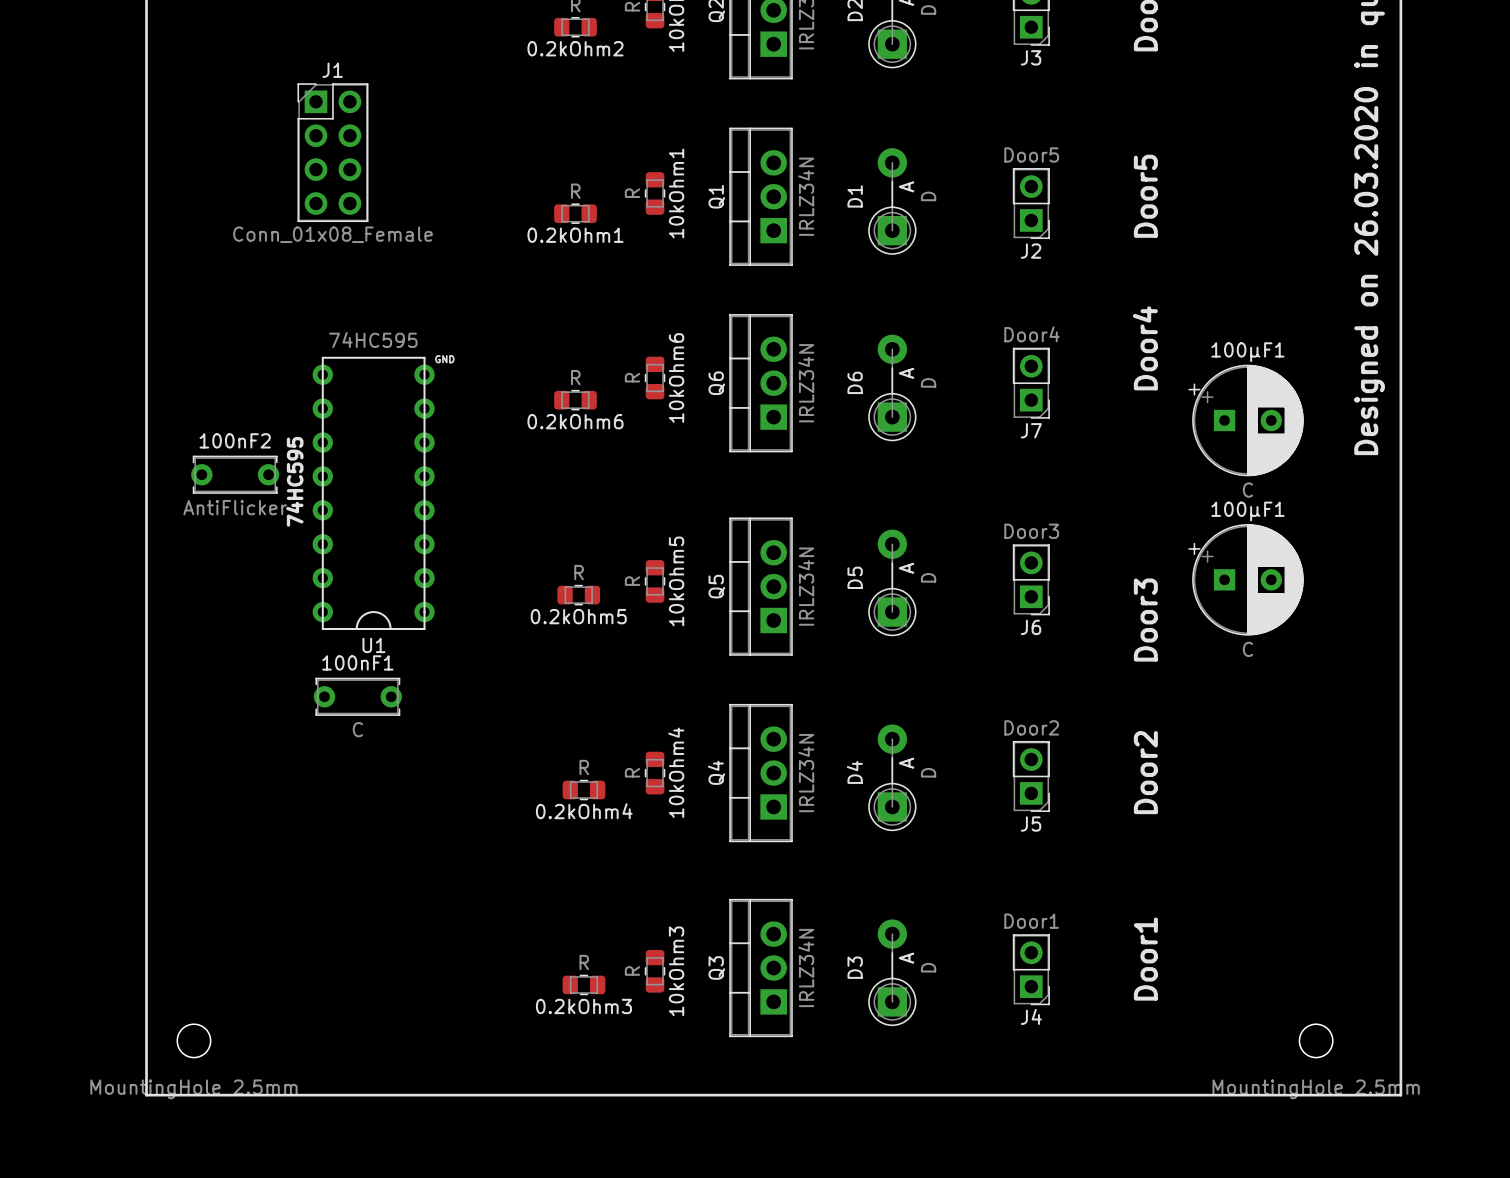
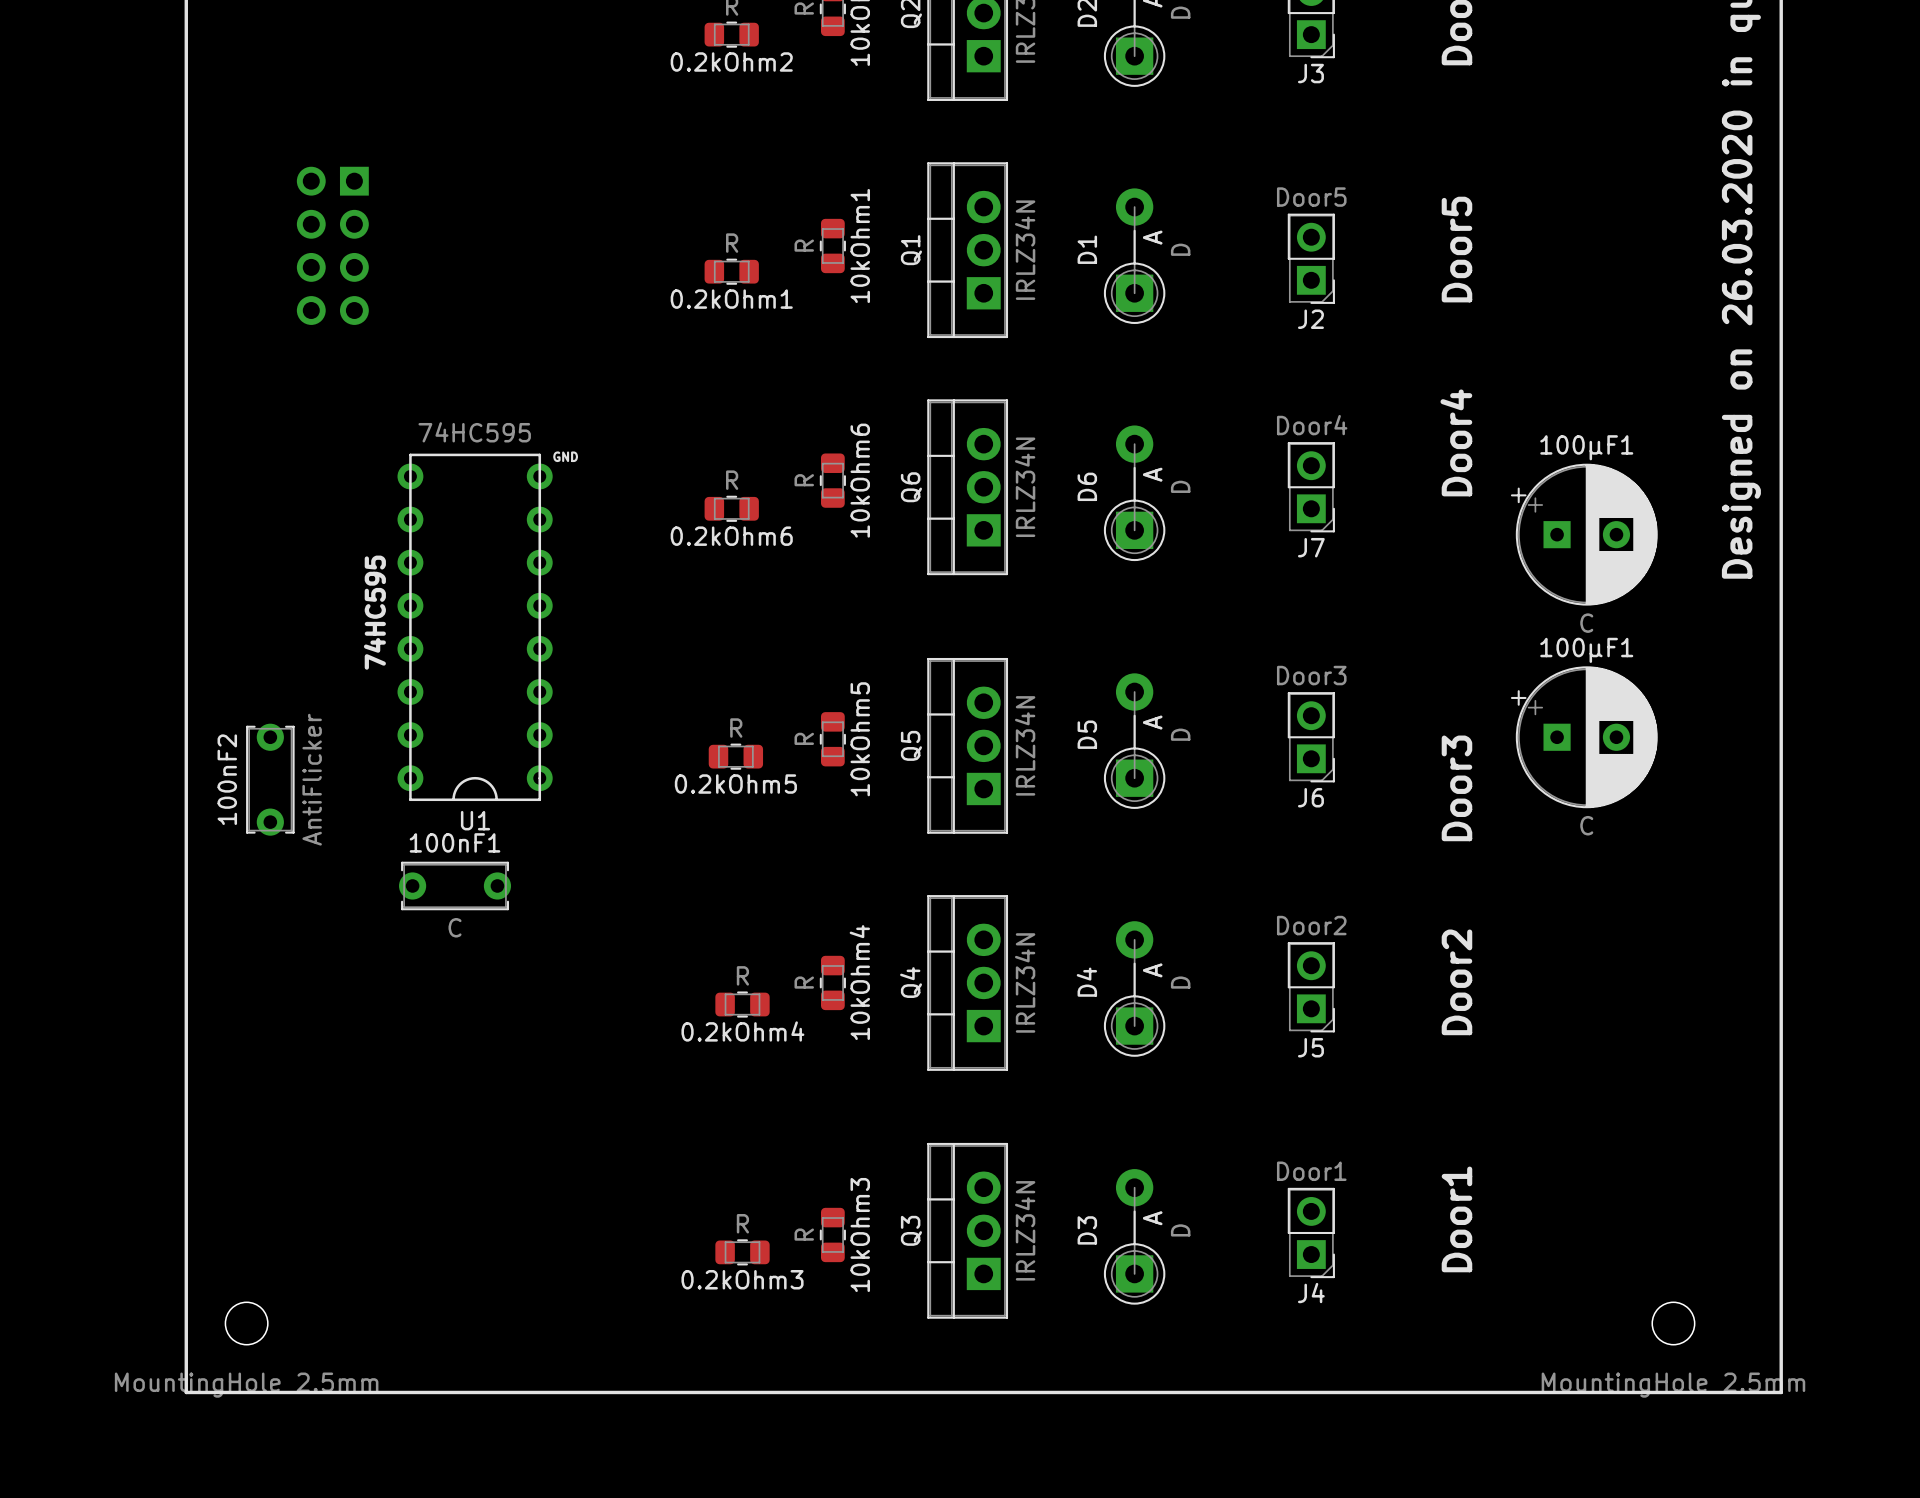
J1 side: top (332, 152) -> bottom (332, 245)
100nF2 name position: 100nF2 (235, 440) -> 100nF2 (227, 779)
100nF2 rotation: 0° (235, 474) -> 90° clockwise (270, 779)
100nF2 position: (235, 474) -> (270, 779)
100nF2 value position: AntiFlicker (235, 507) -> AntiFlicker (312, 779)

